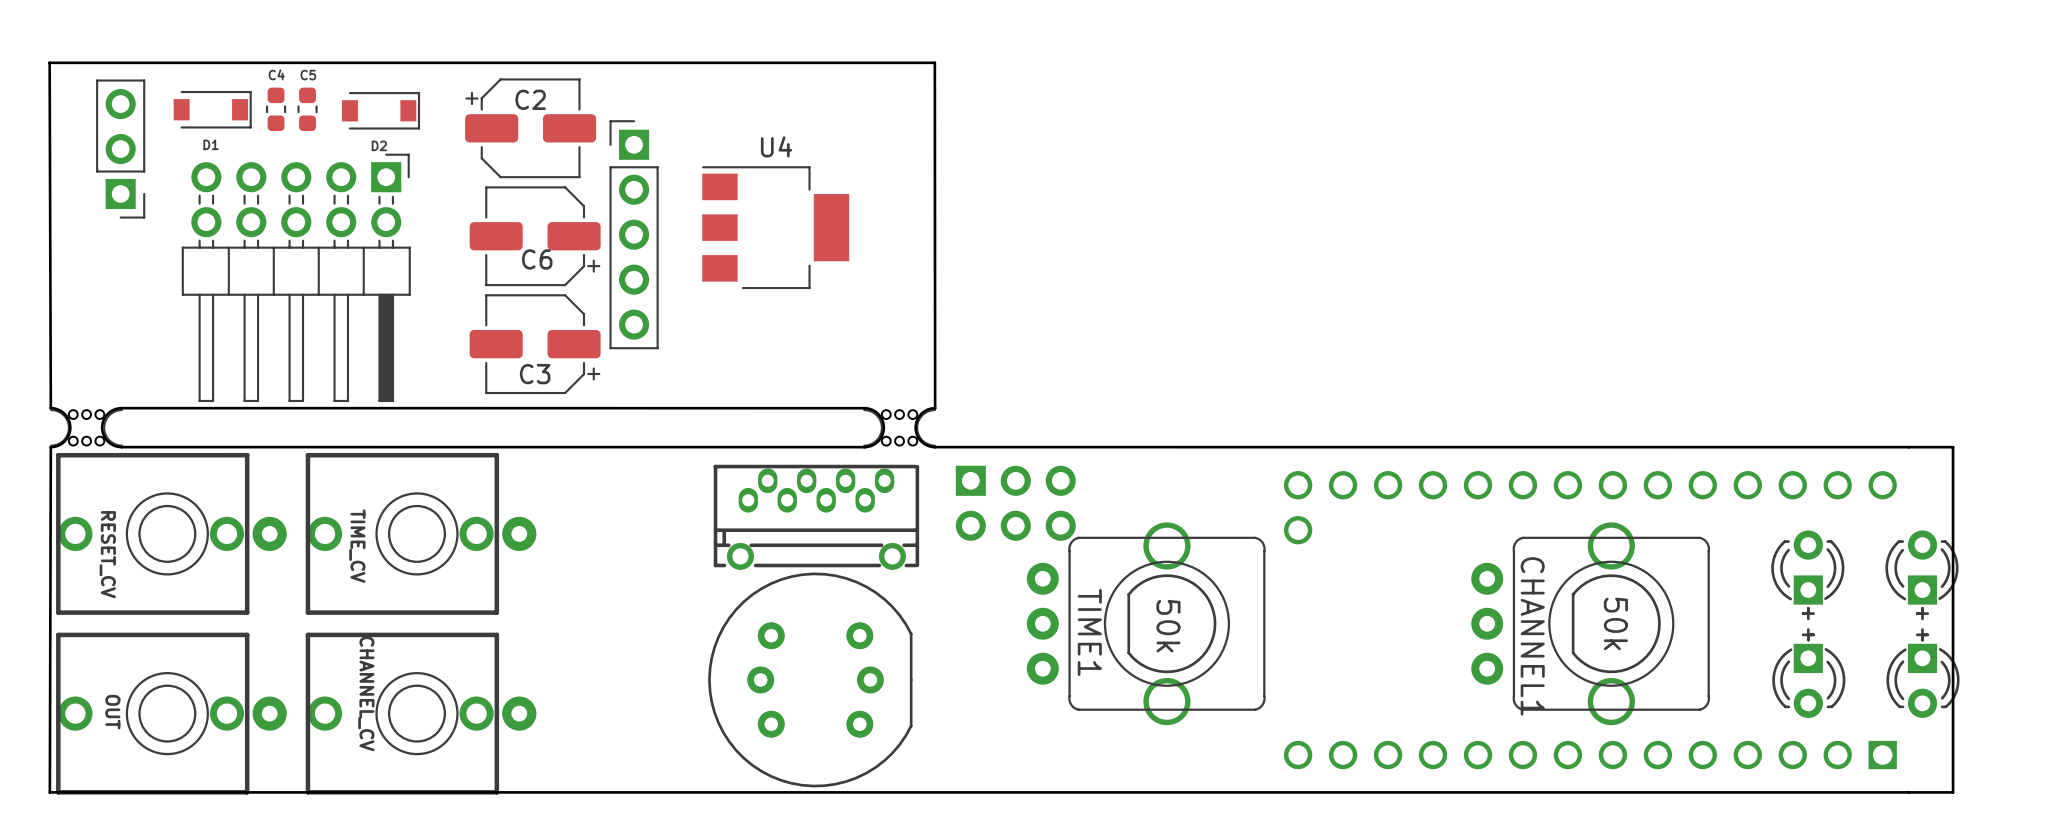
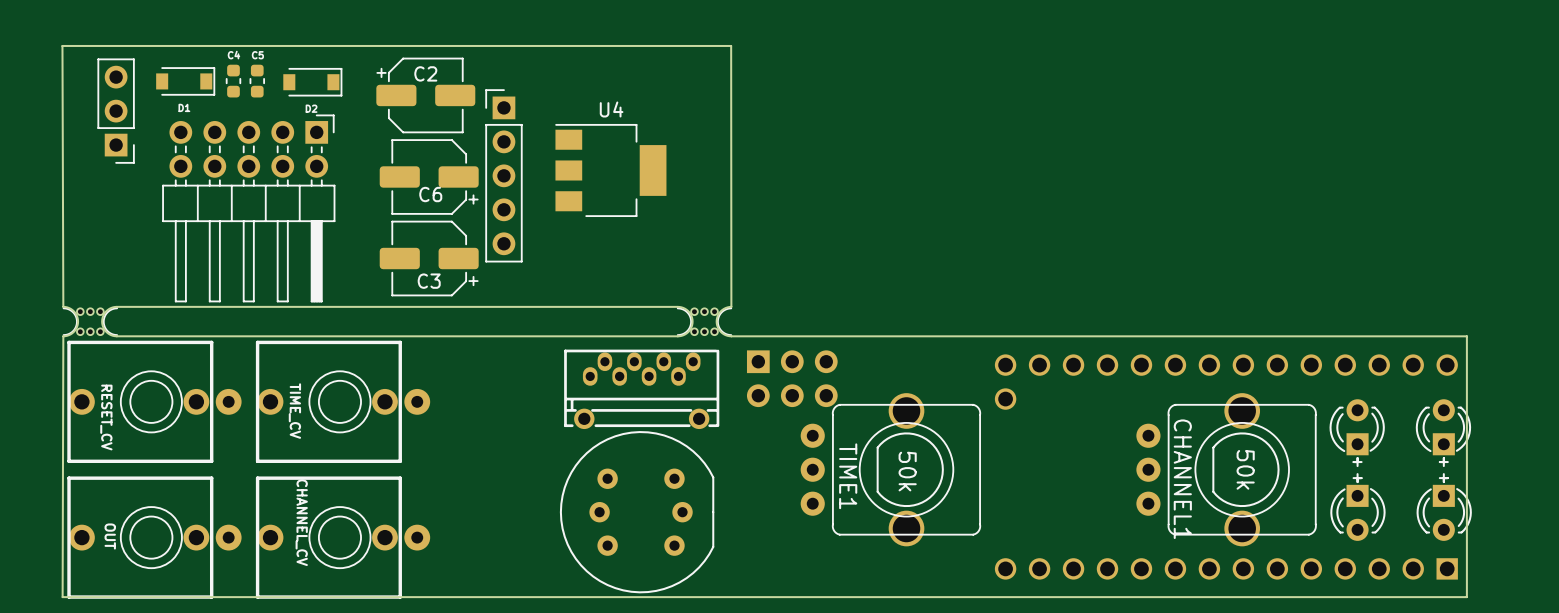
board edge: (1908, 447) (1953, 447) (1953, 792) (1908, 792) -> (1466, 336) (1466, 597)
part: none -> (1357, 433)
part: (1807, 575) -> none
part: none -> (1443, 433)
part: (1921, 575) -> none
part: none -> (1357, 506)
part: (1808, 673) -> none
part: none -> (1444, 506)
part: (1923, 673) -> none

